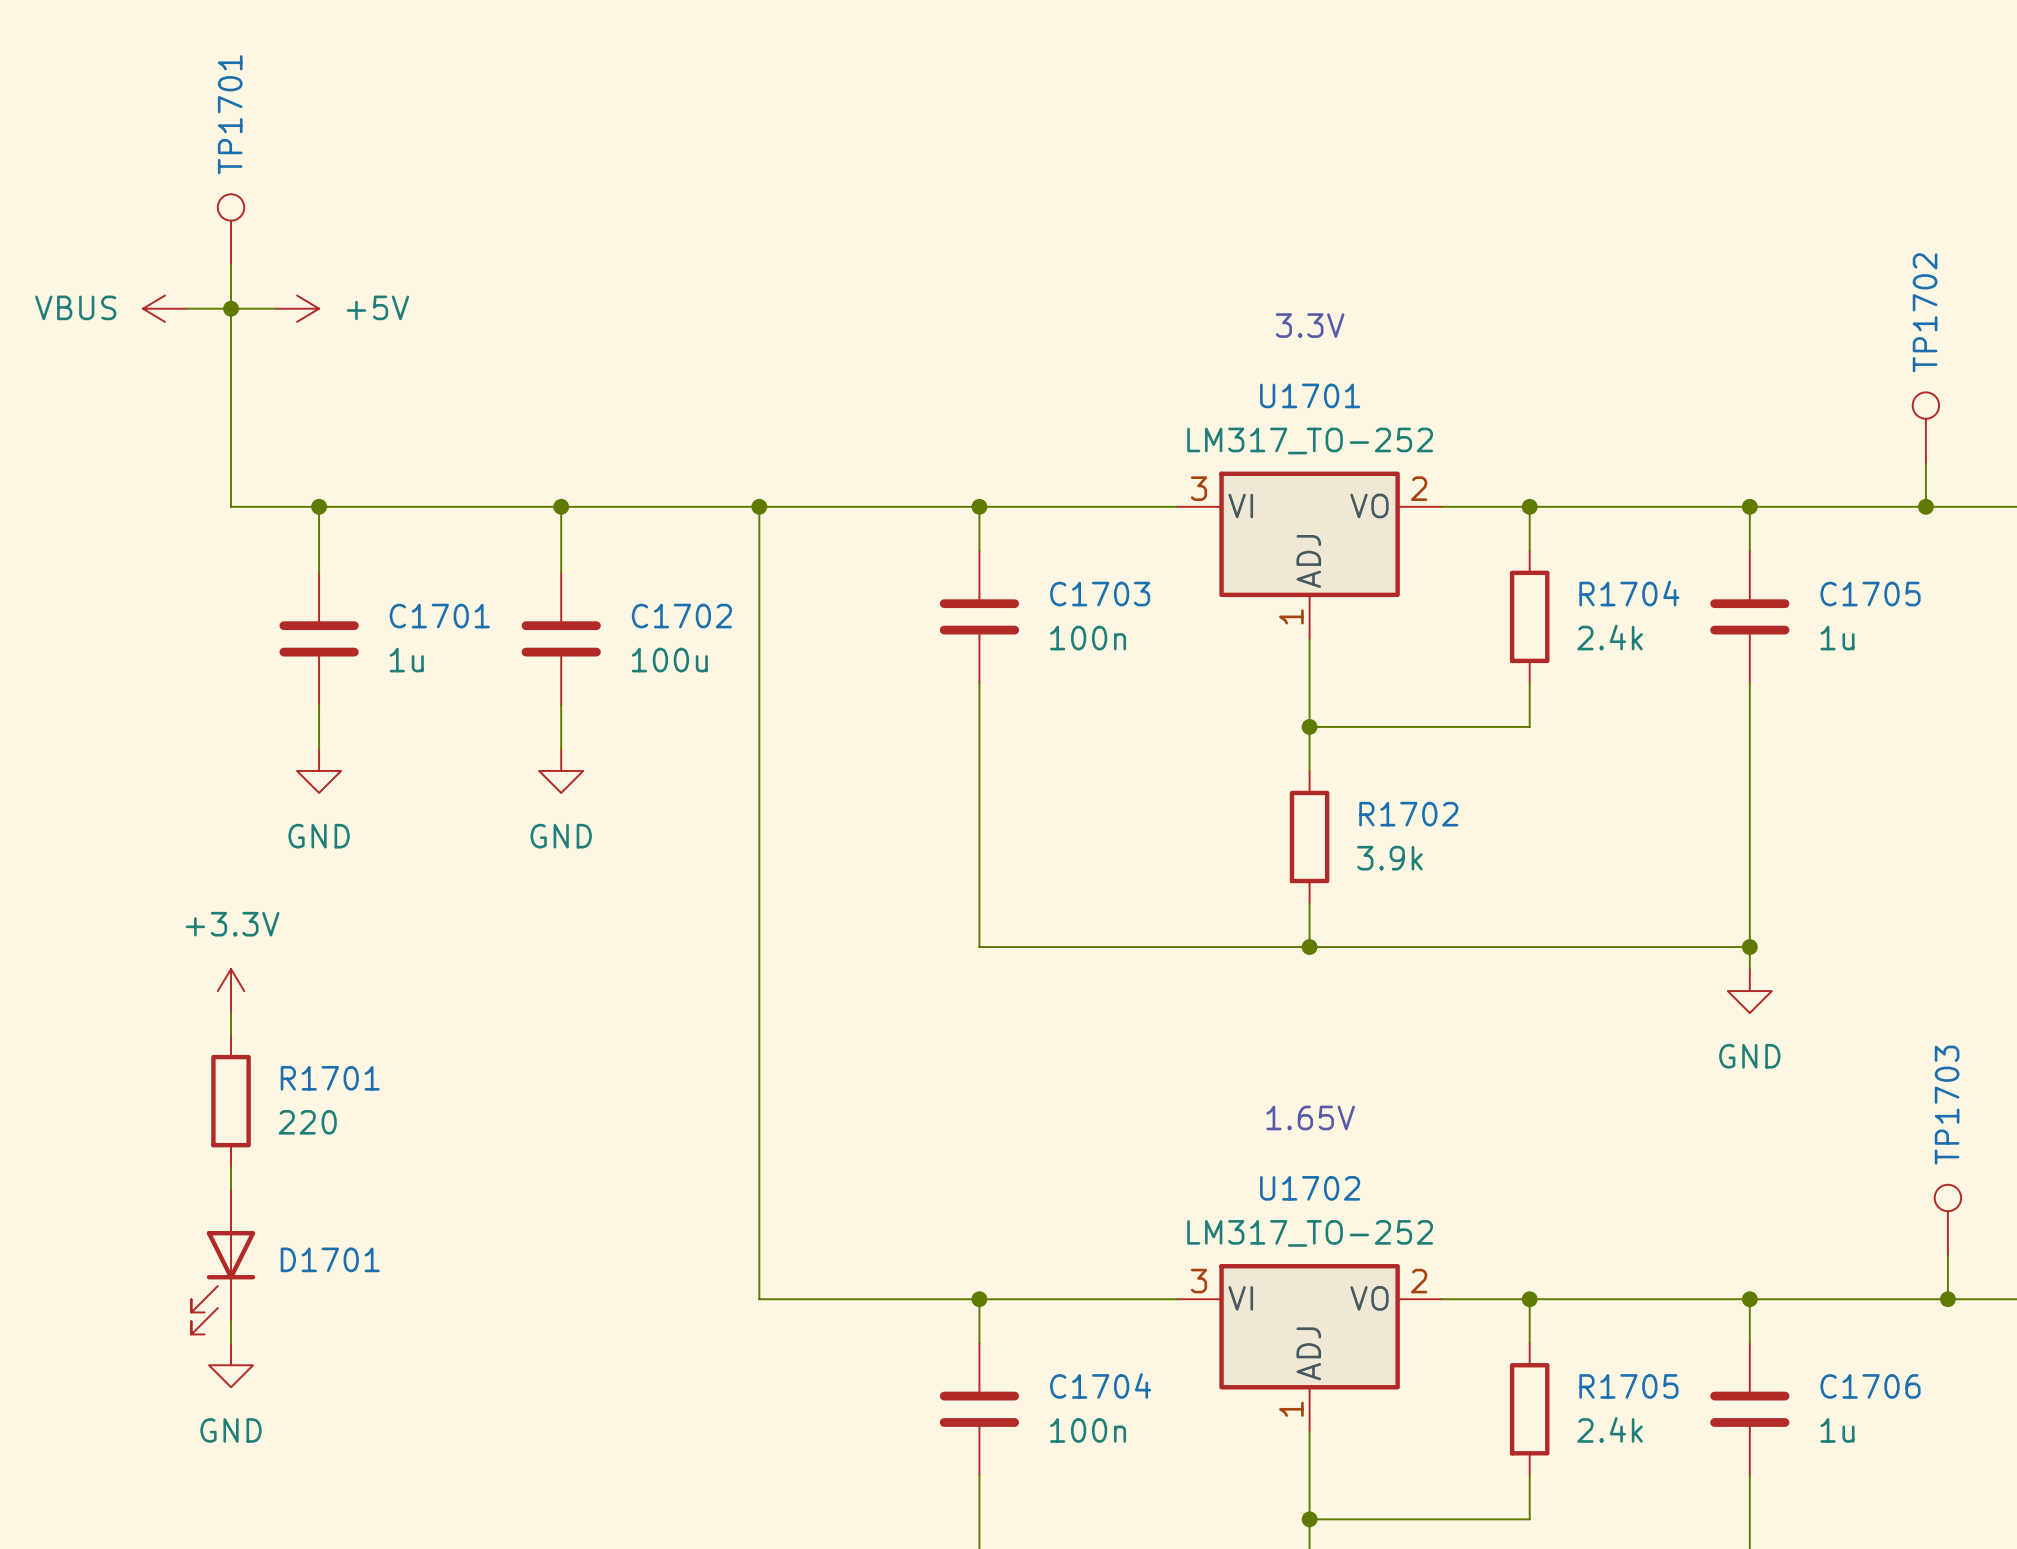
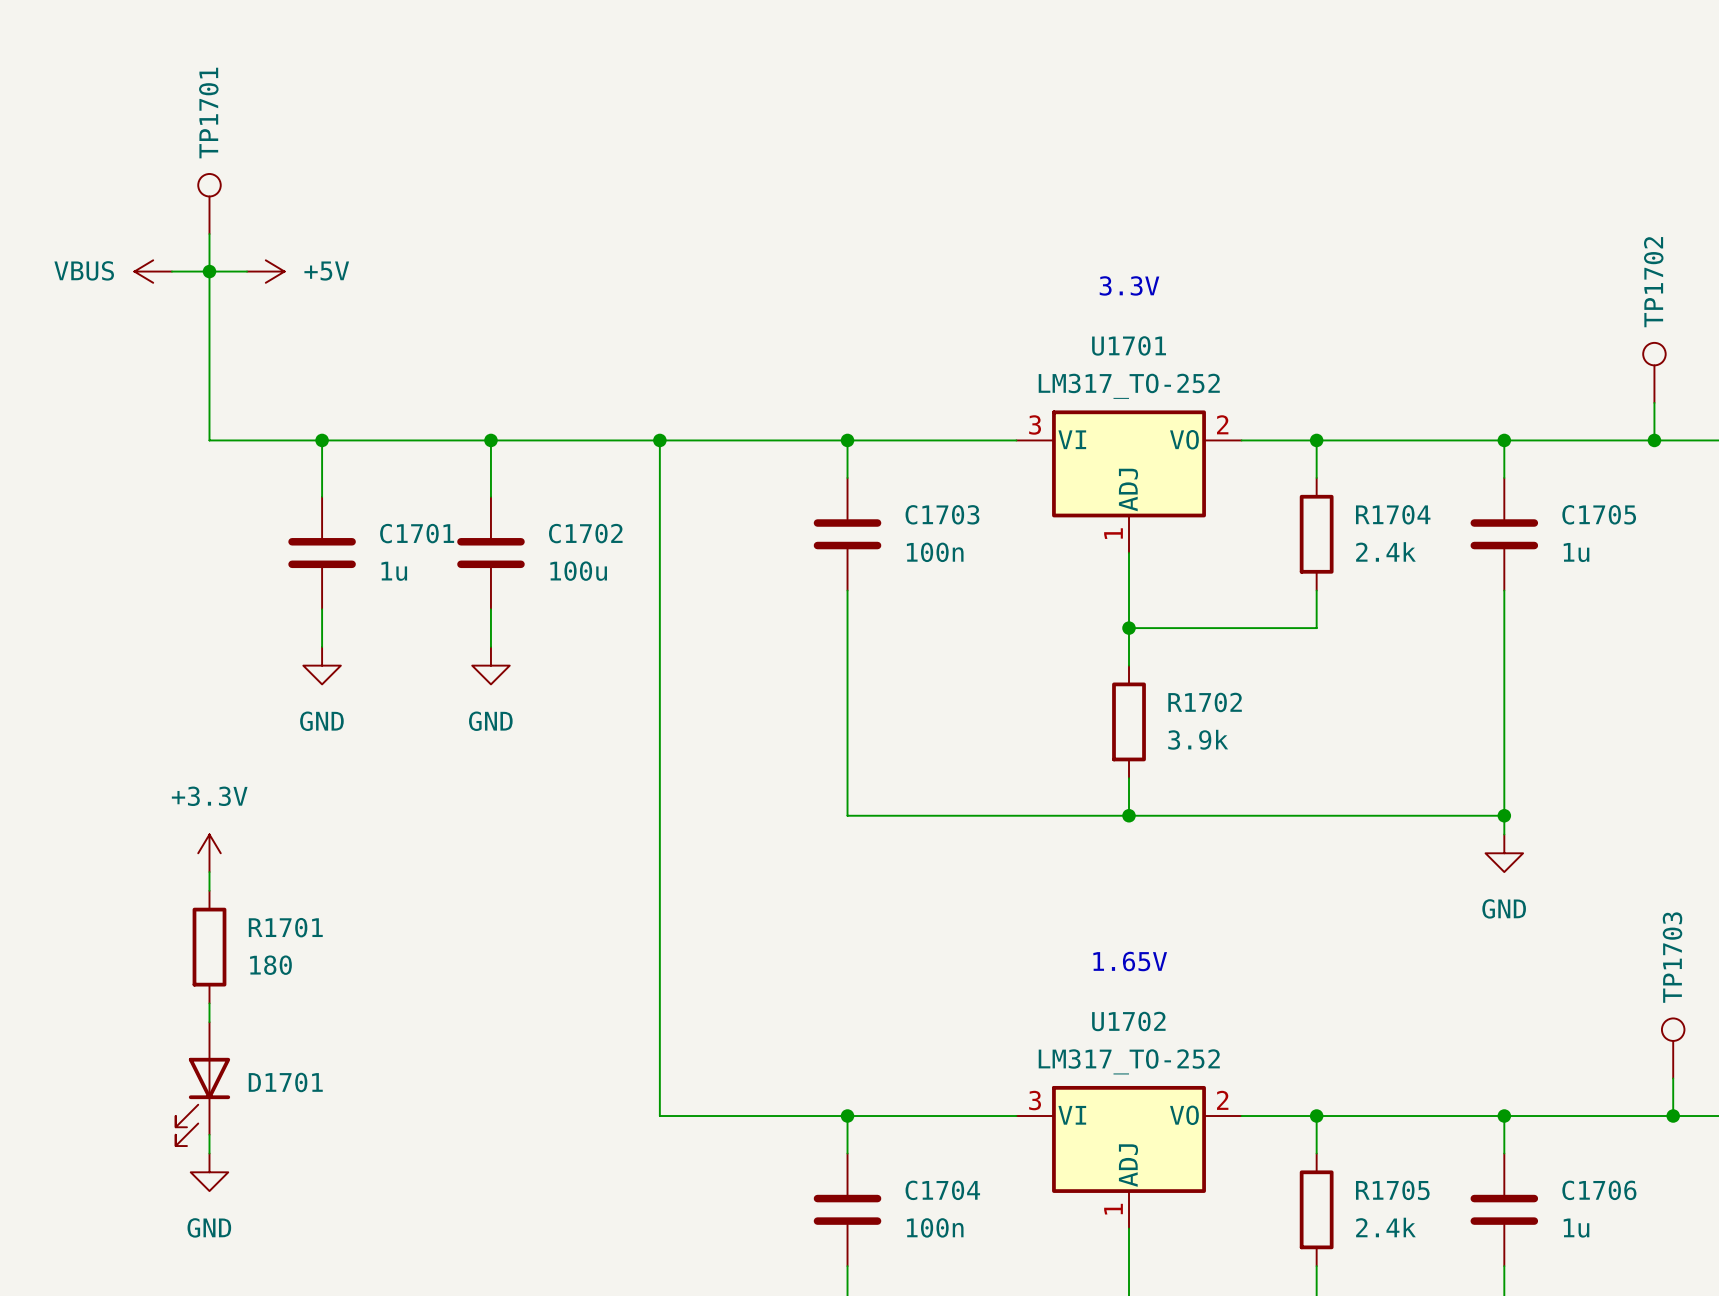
wire: (319, 506) (319, 572) -> (322, 440) (322, 496)
junction position: (319, 506) -> (322, 440)
C1701 position: (319, 638) -> (322, 553)
wire: (319, 704) (319, 748) -> (322, 609) (322, 646)
power symbol position: GND (319, 770) -> GND (322, 665)
R1701 value: 220 (307, 1122) -> 180 (270, 965)

